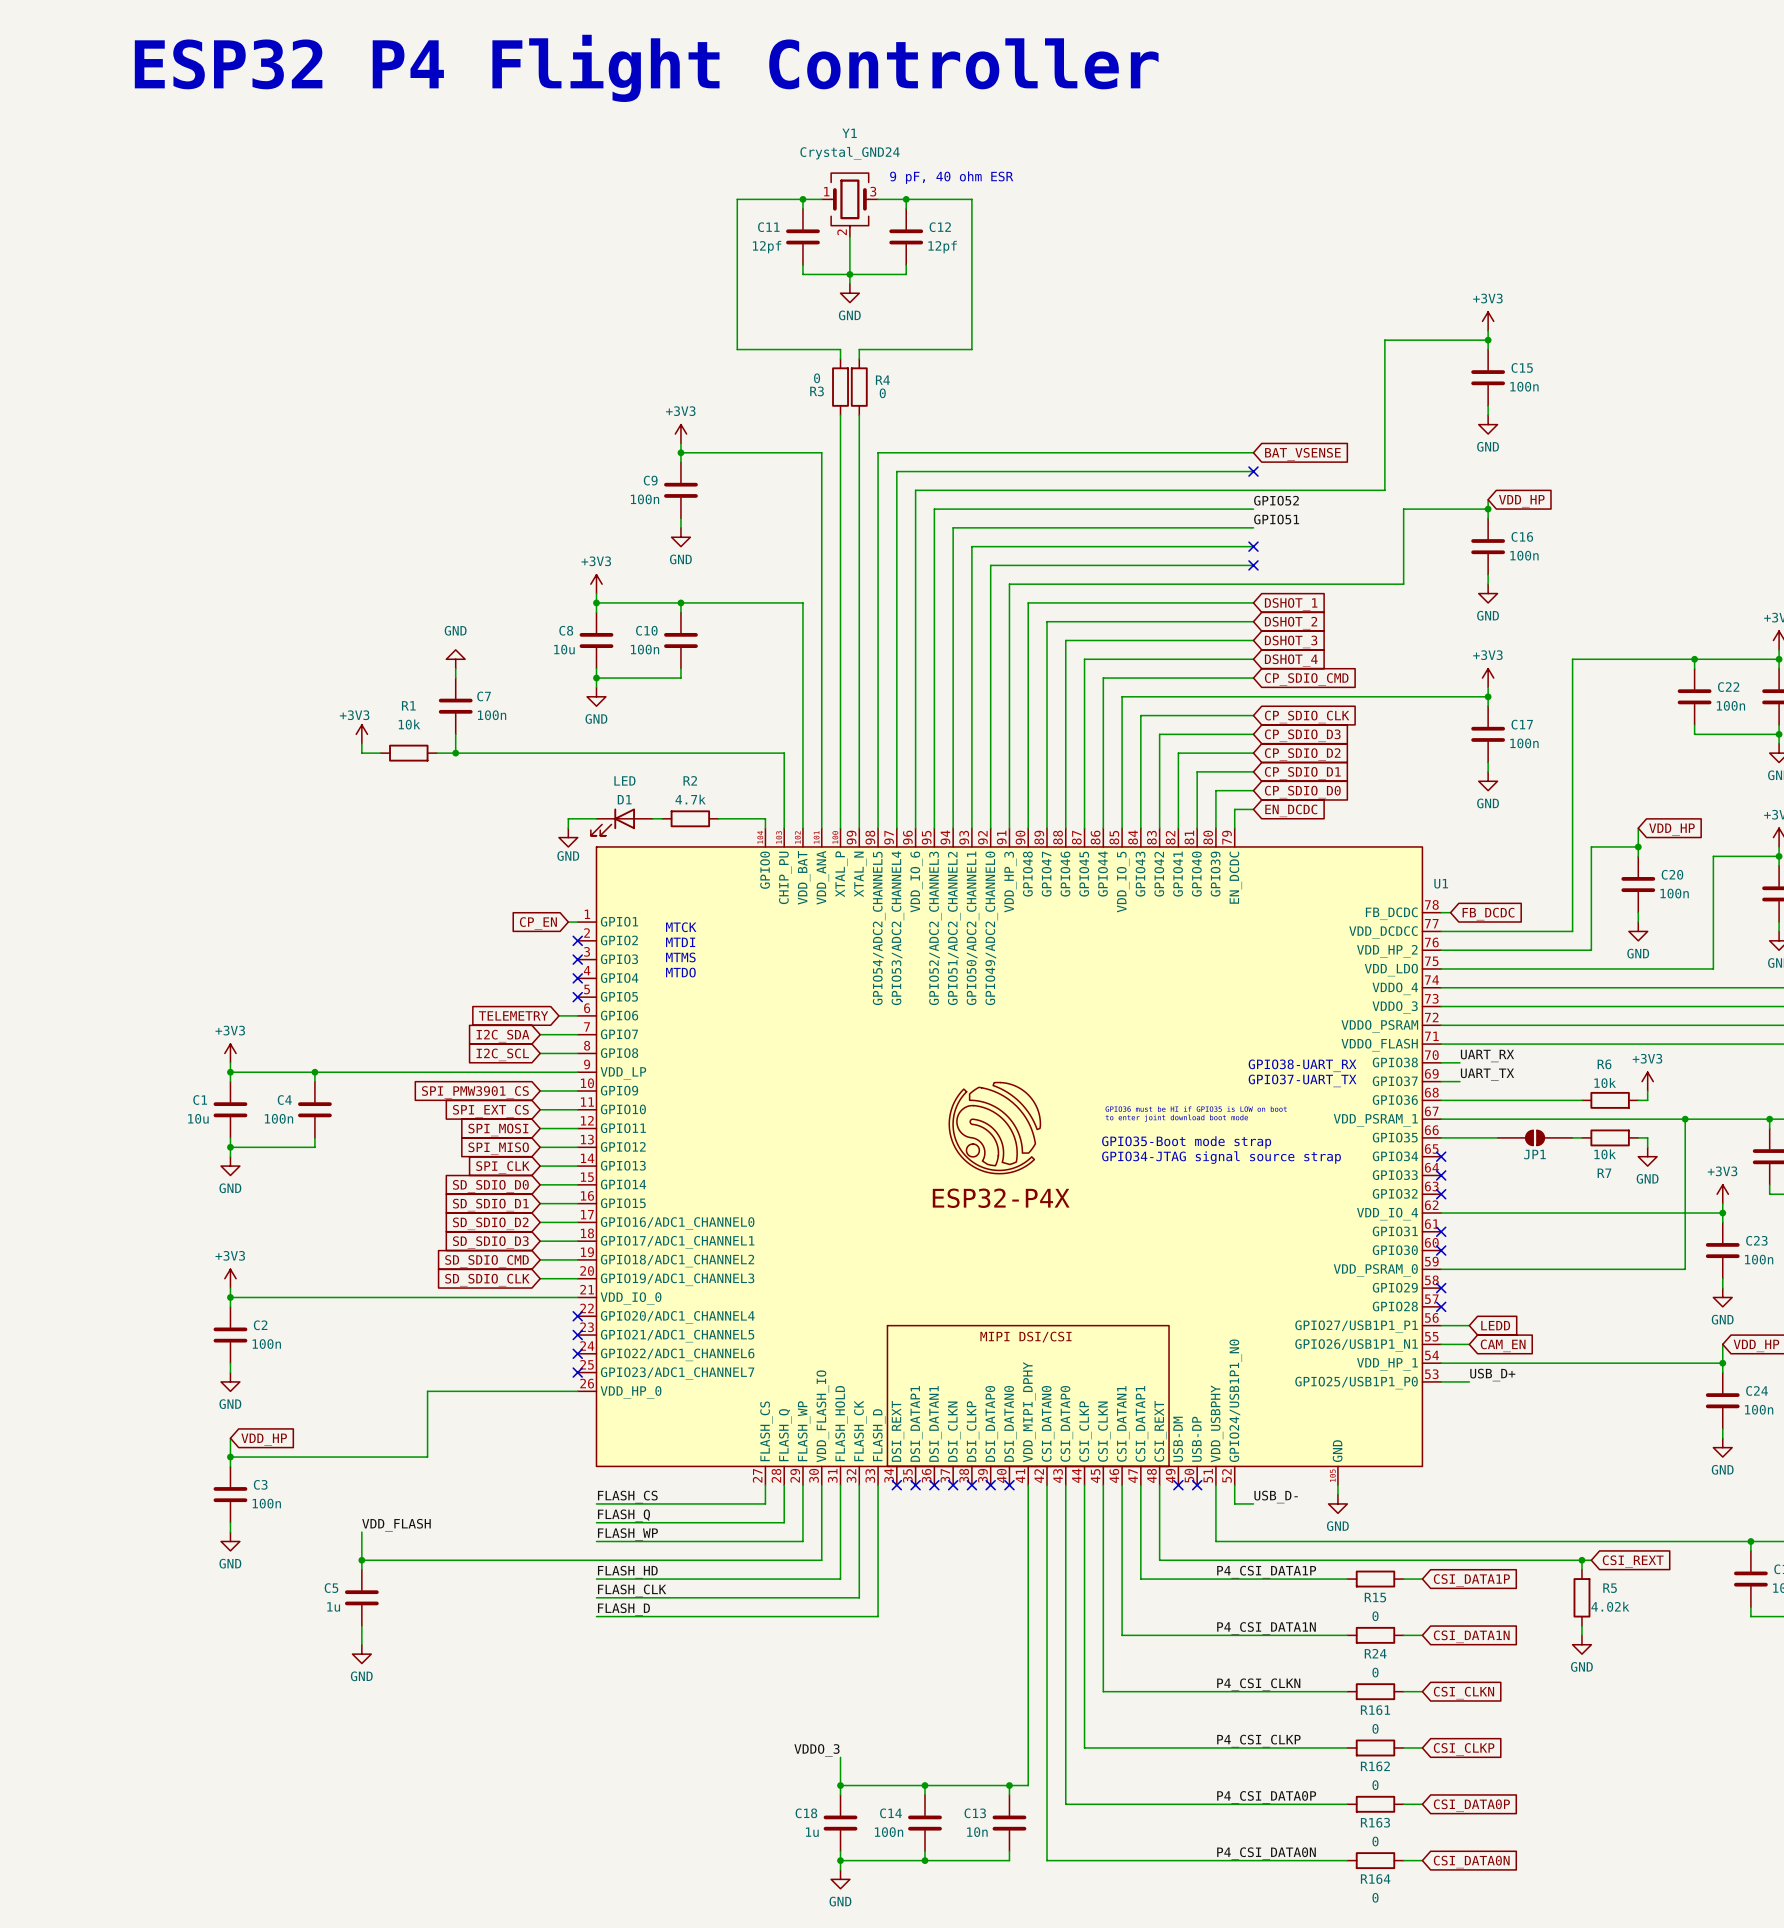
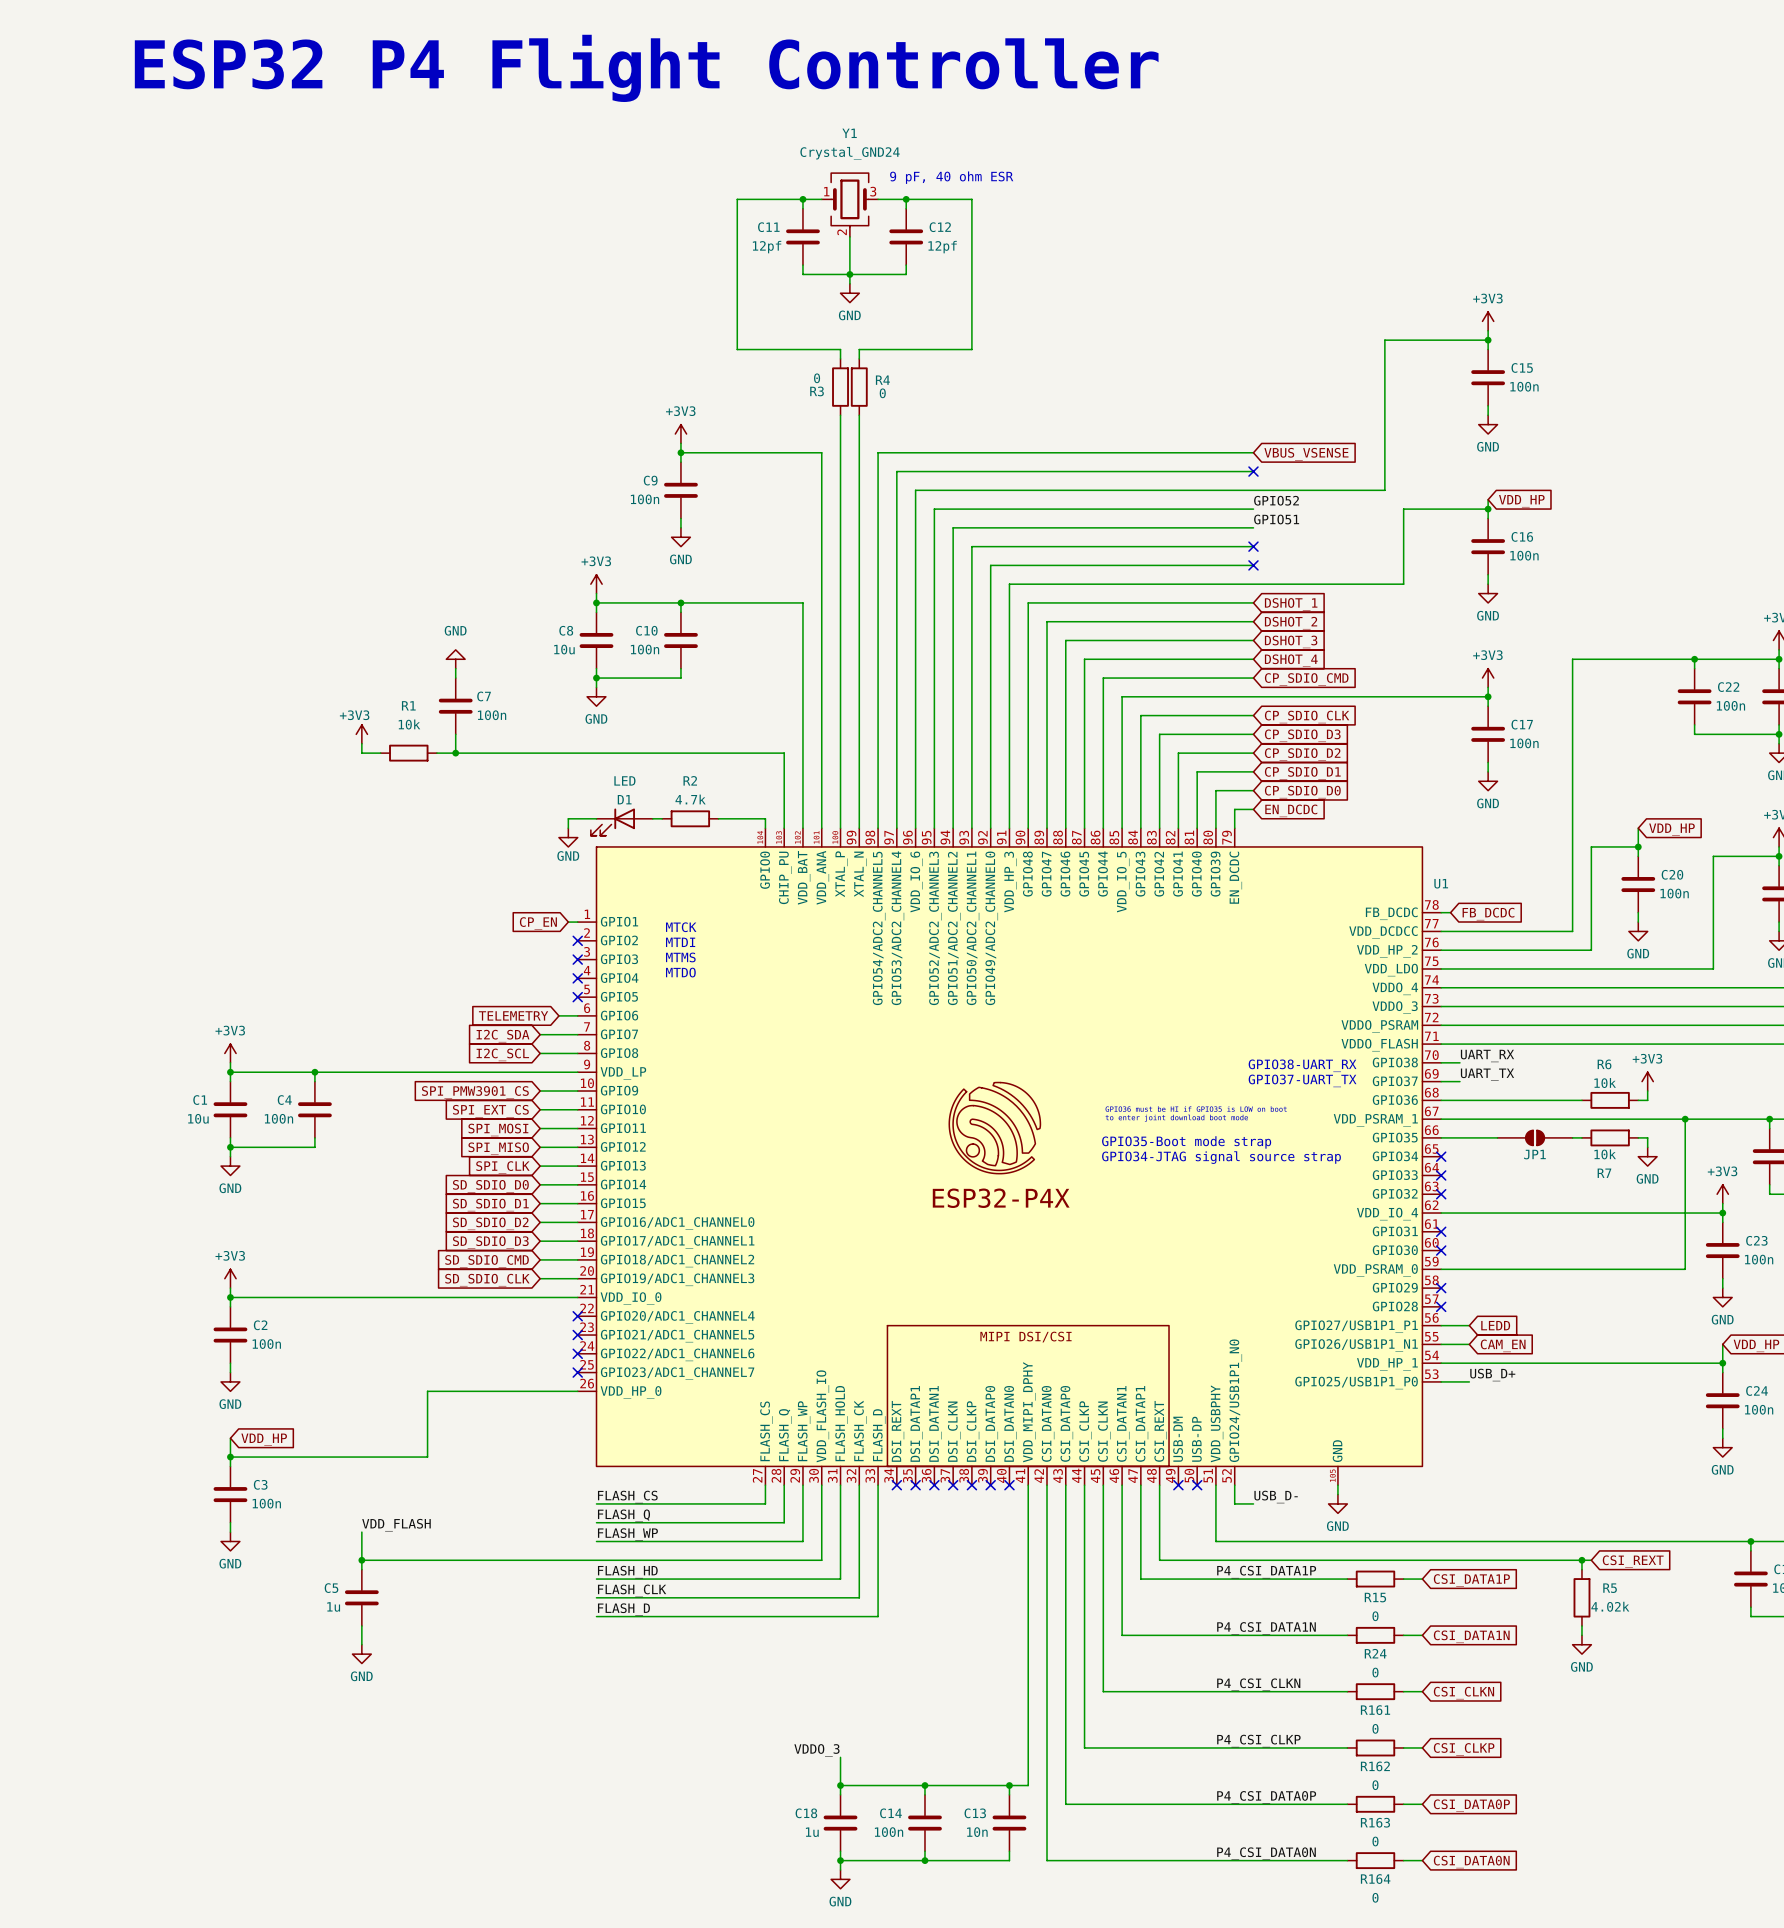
global label: BAT_VSENSE (1302, 454) -> VBUS_VSENSE (1306, 454)

